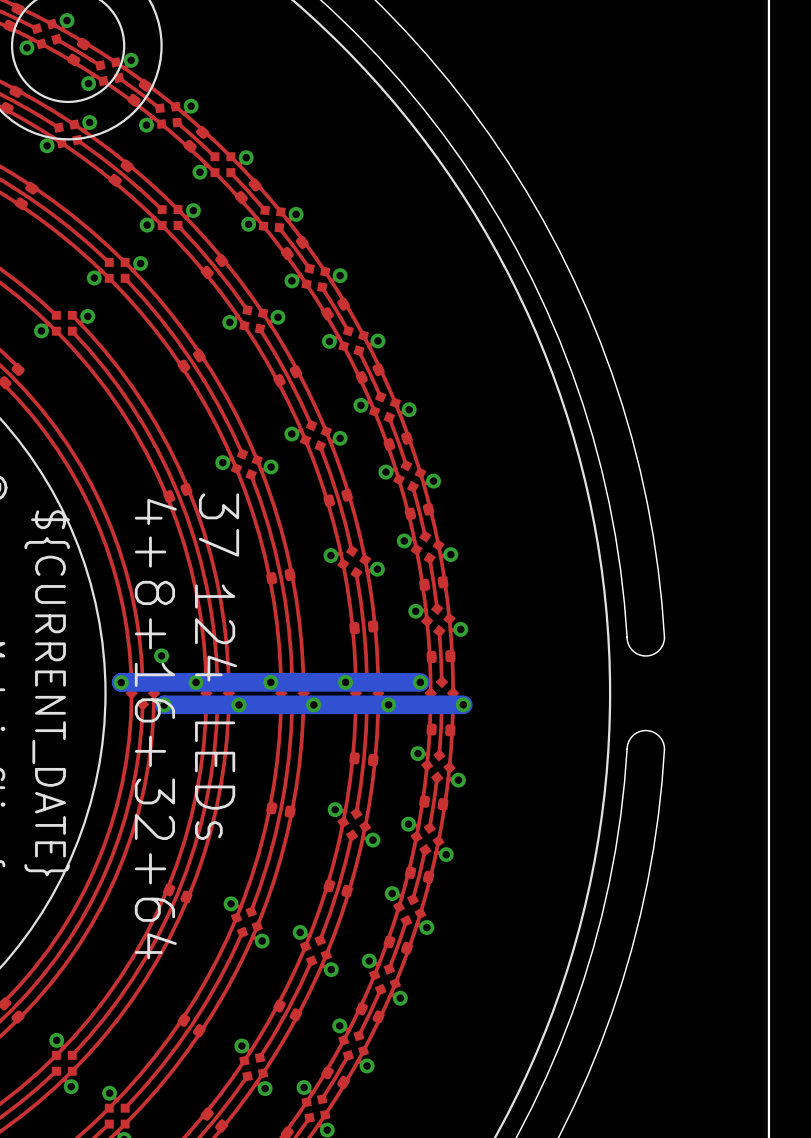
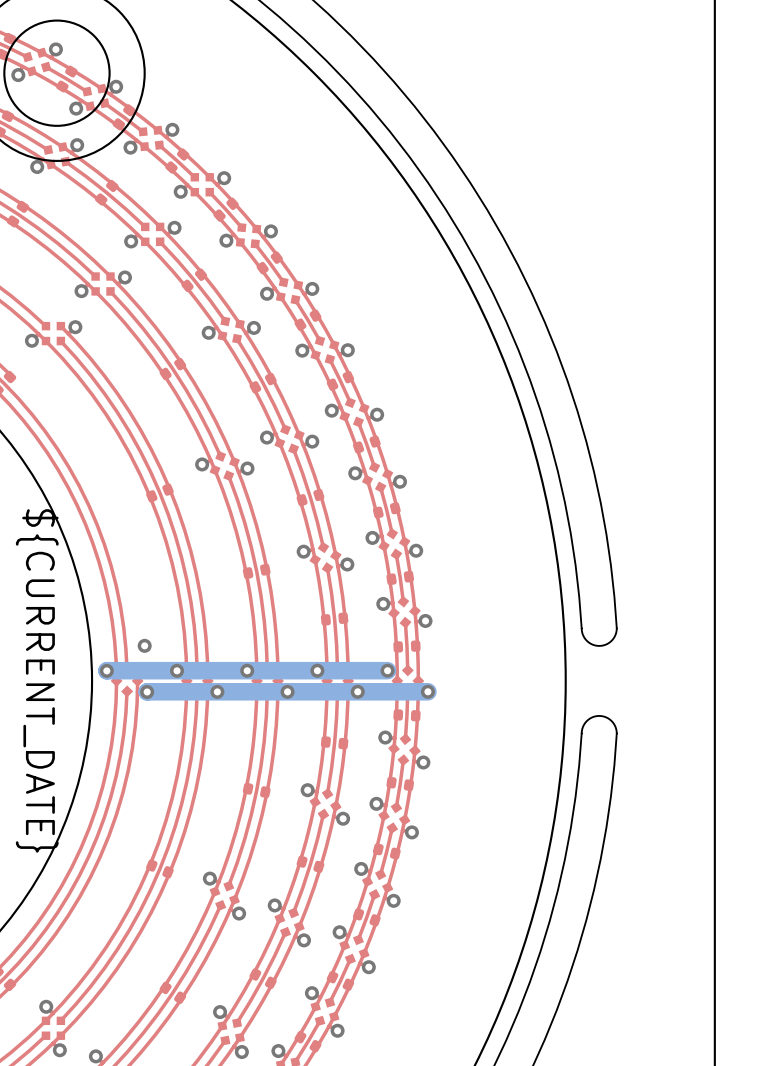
text: 37 (219, 525) -> none
text: 124 LEDs (216, 712) -> none
text: 4+8+16+32+64 (155, 729) -> none

